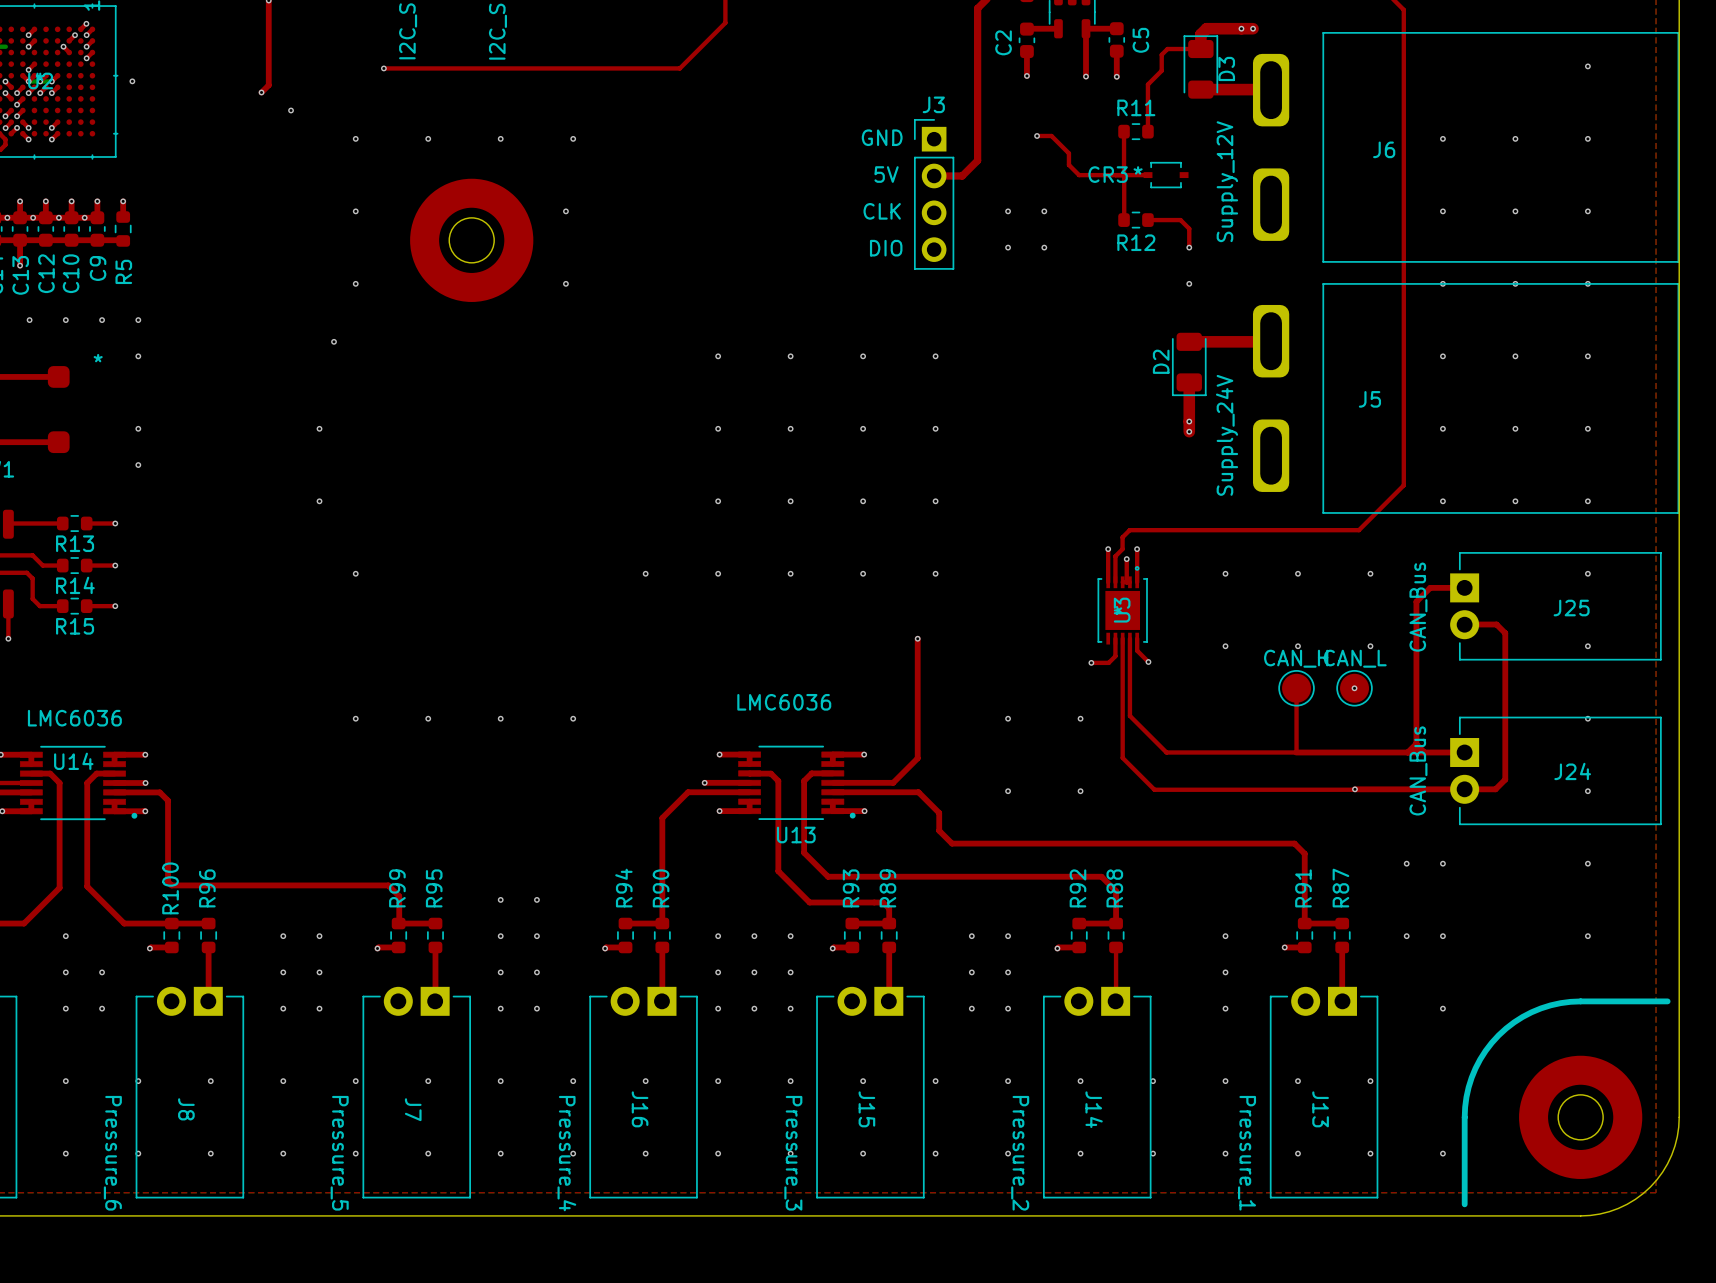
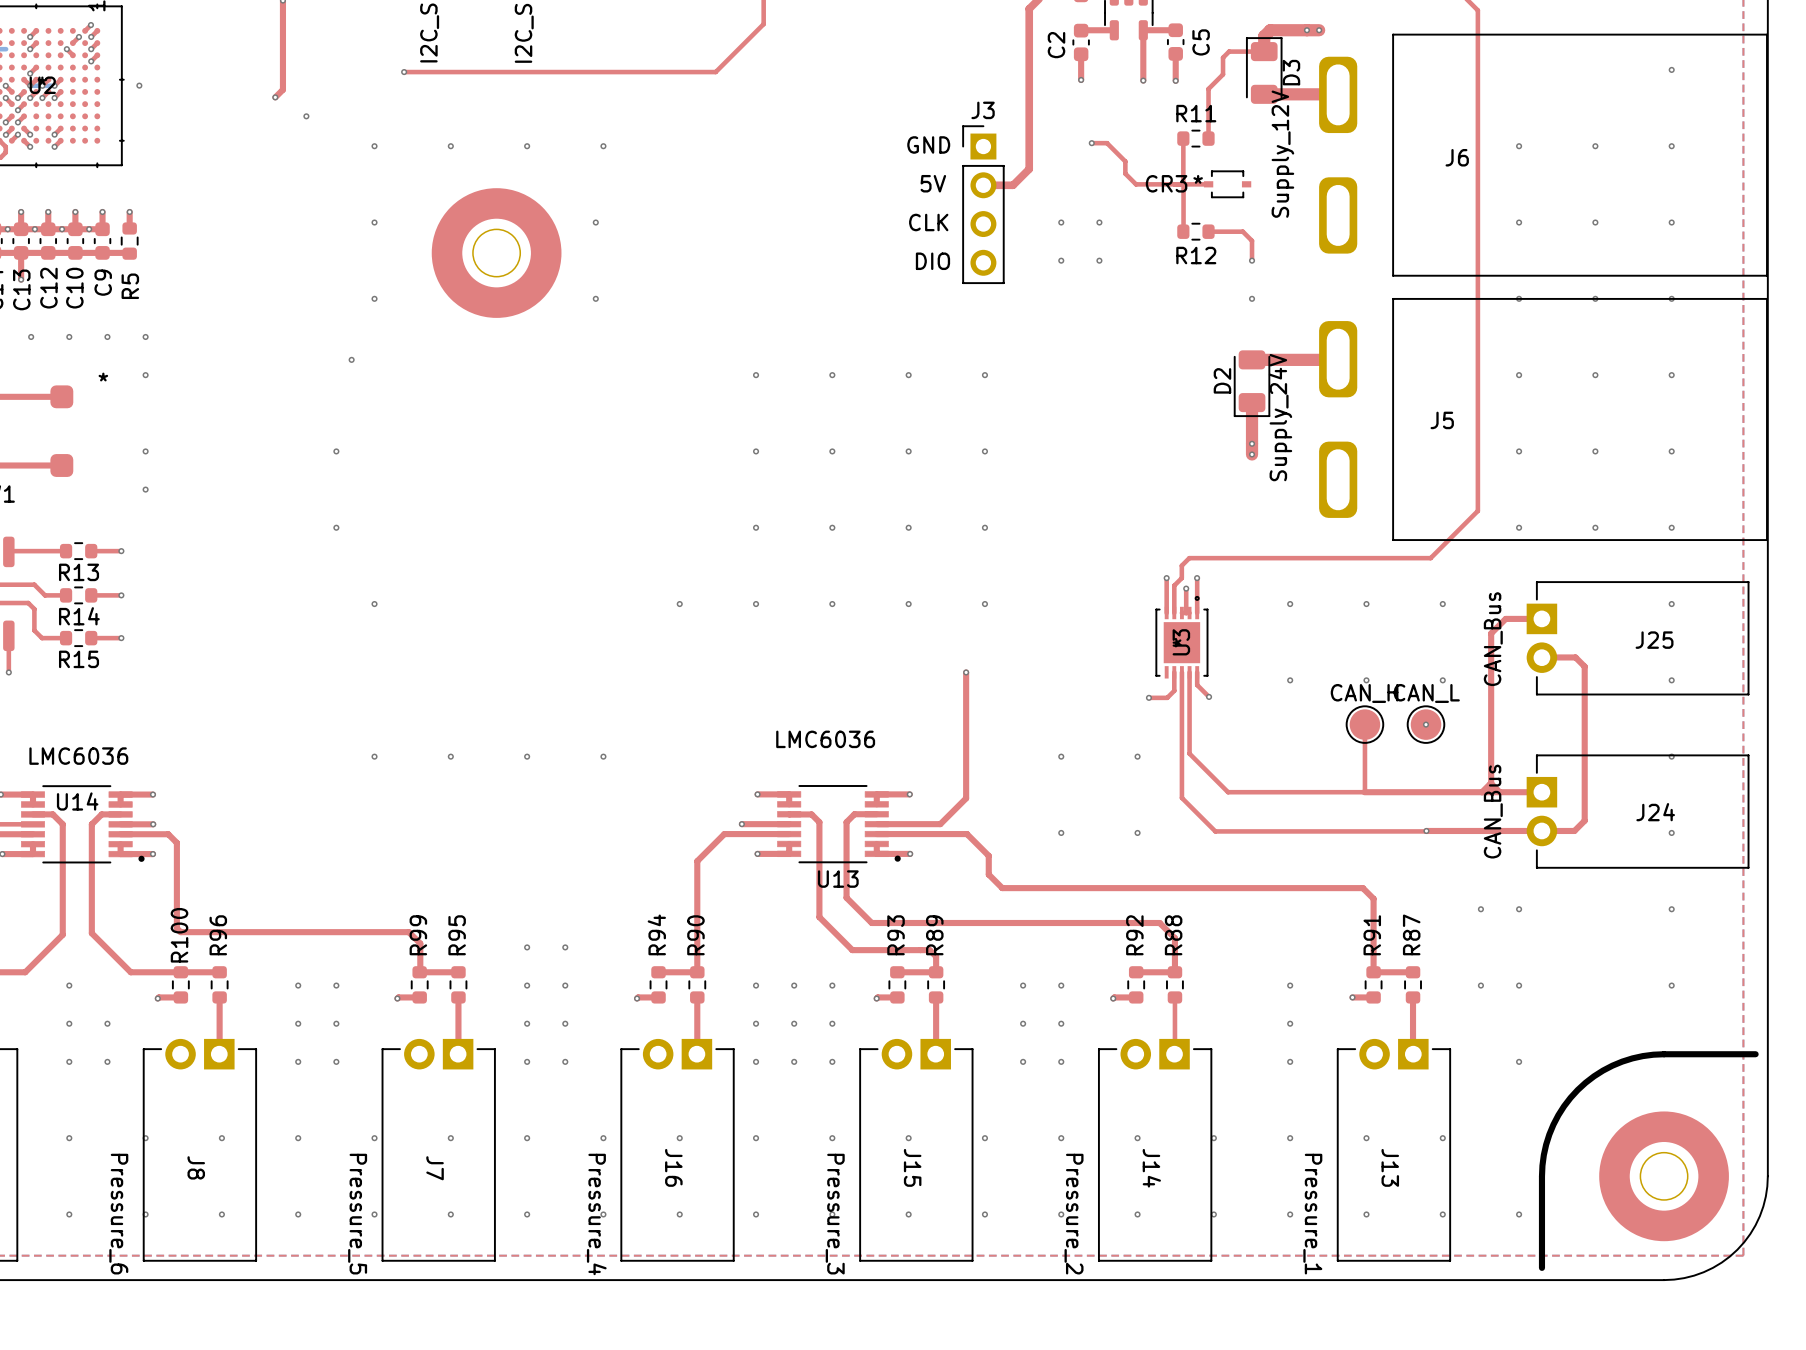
J6 value position: Supply_12V (1227, 181) -> Supply_12V (1282, 154)
J5 value position: Supply_24V (1227, 435) -> Supply_24V (1280, 417)

